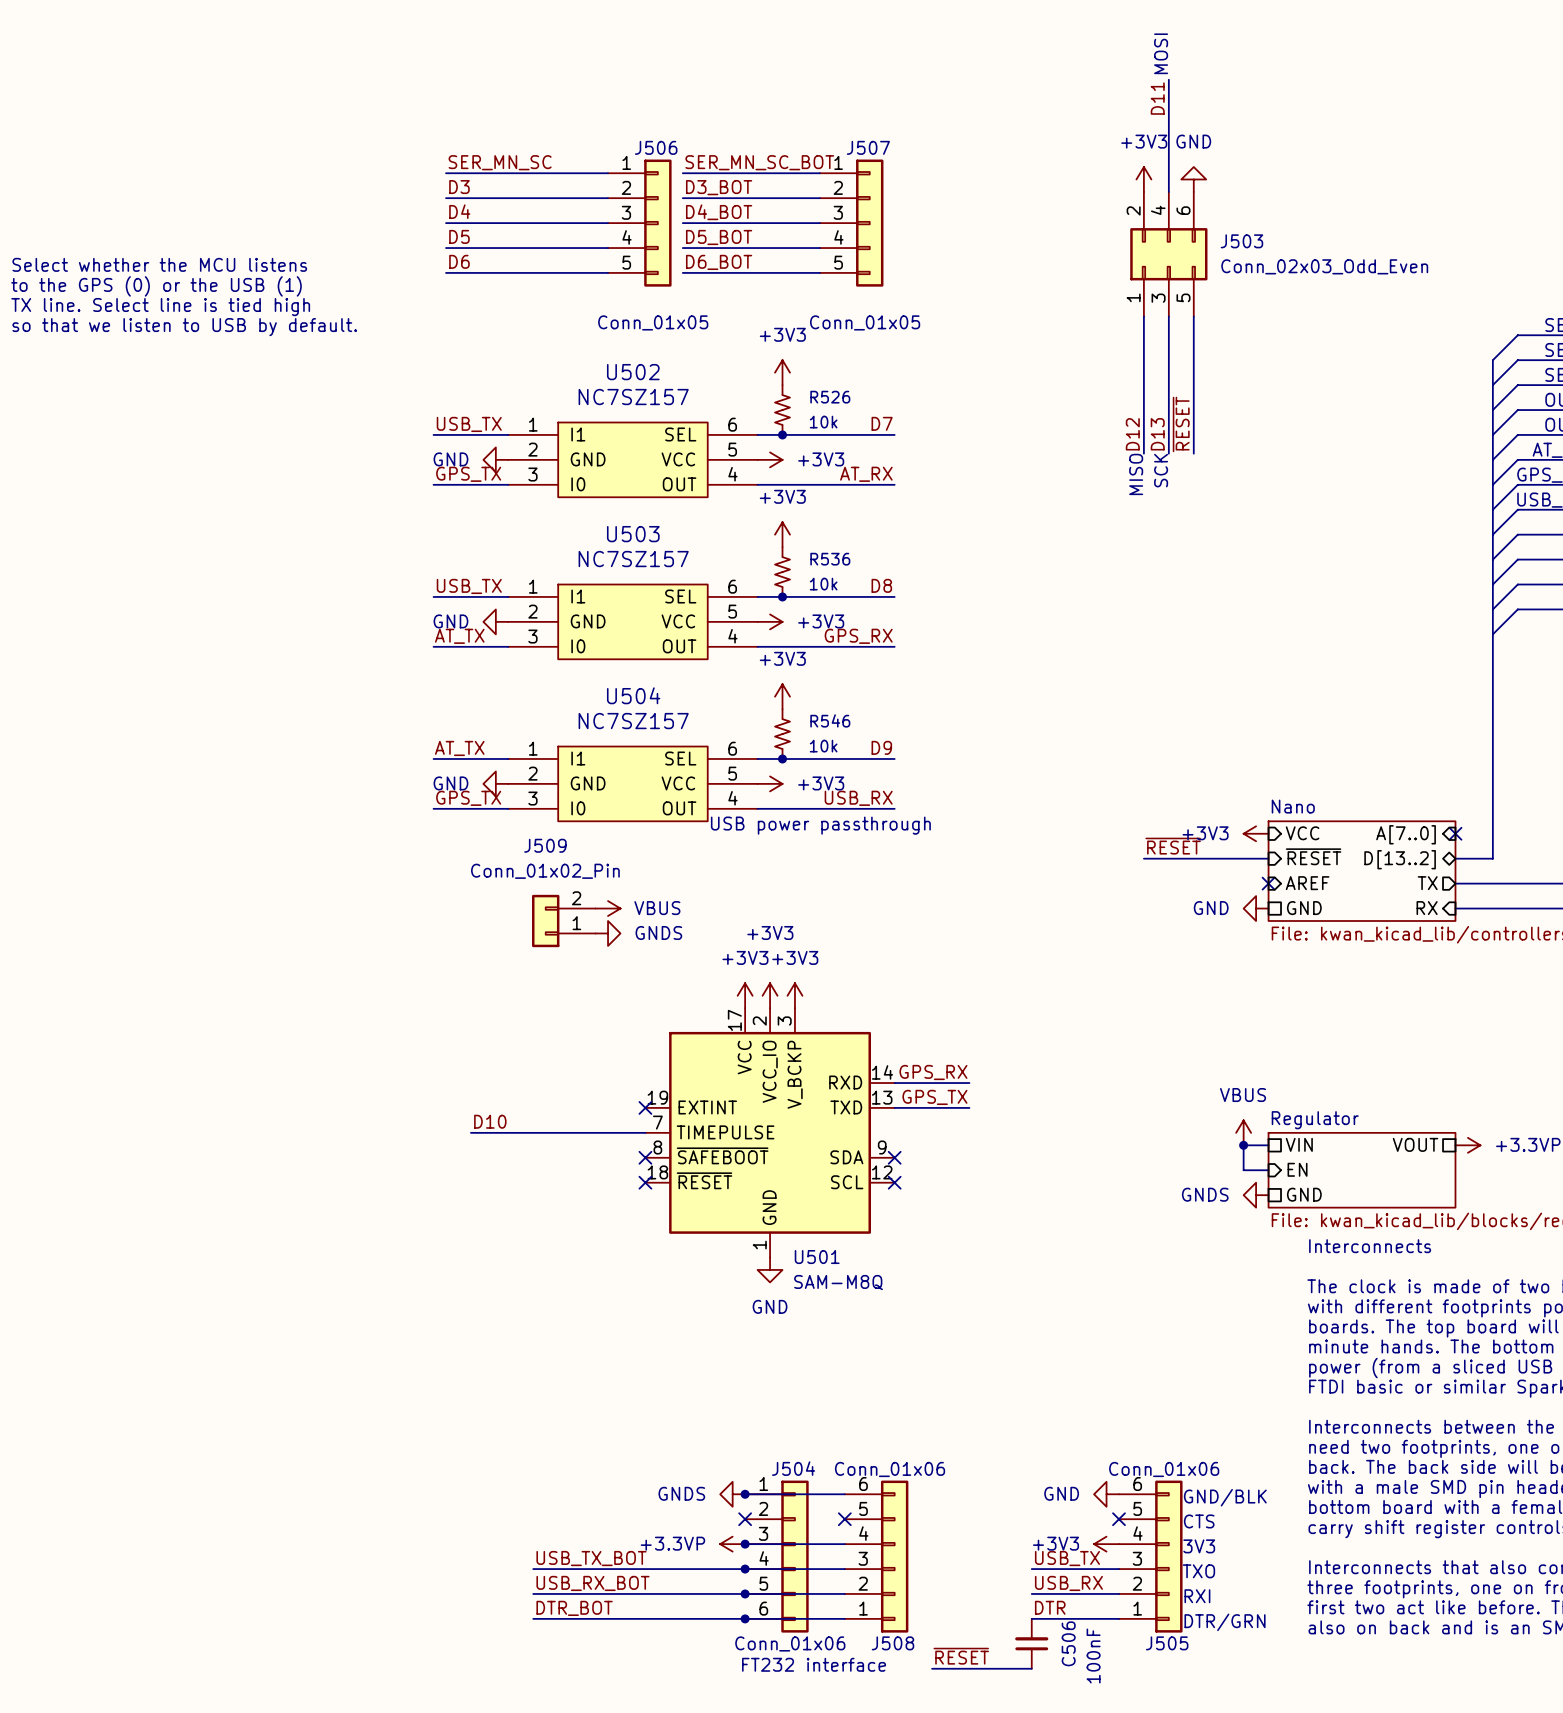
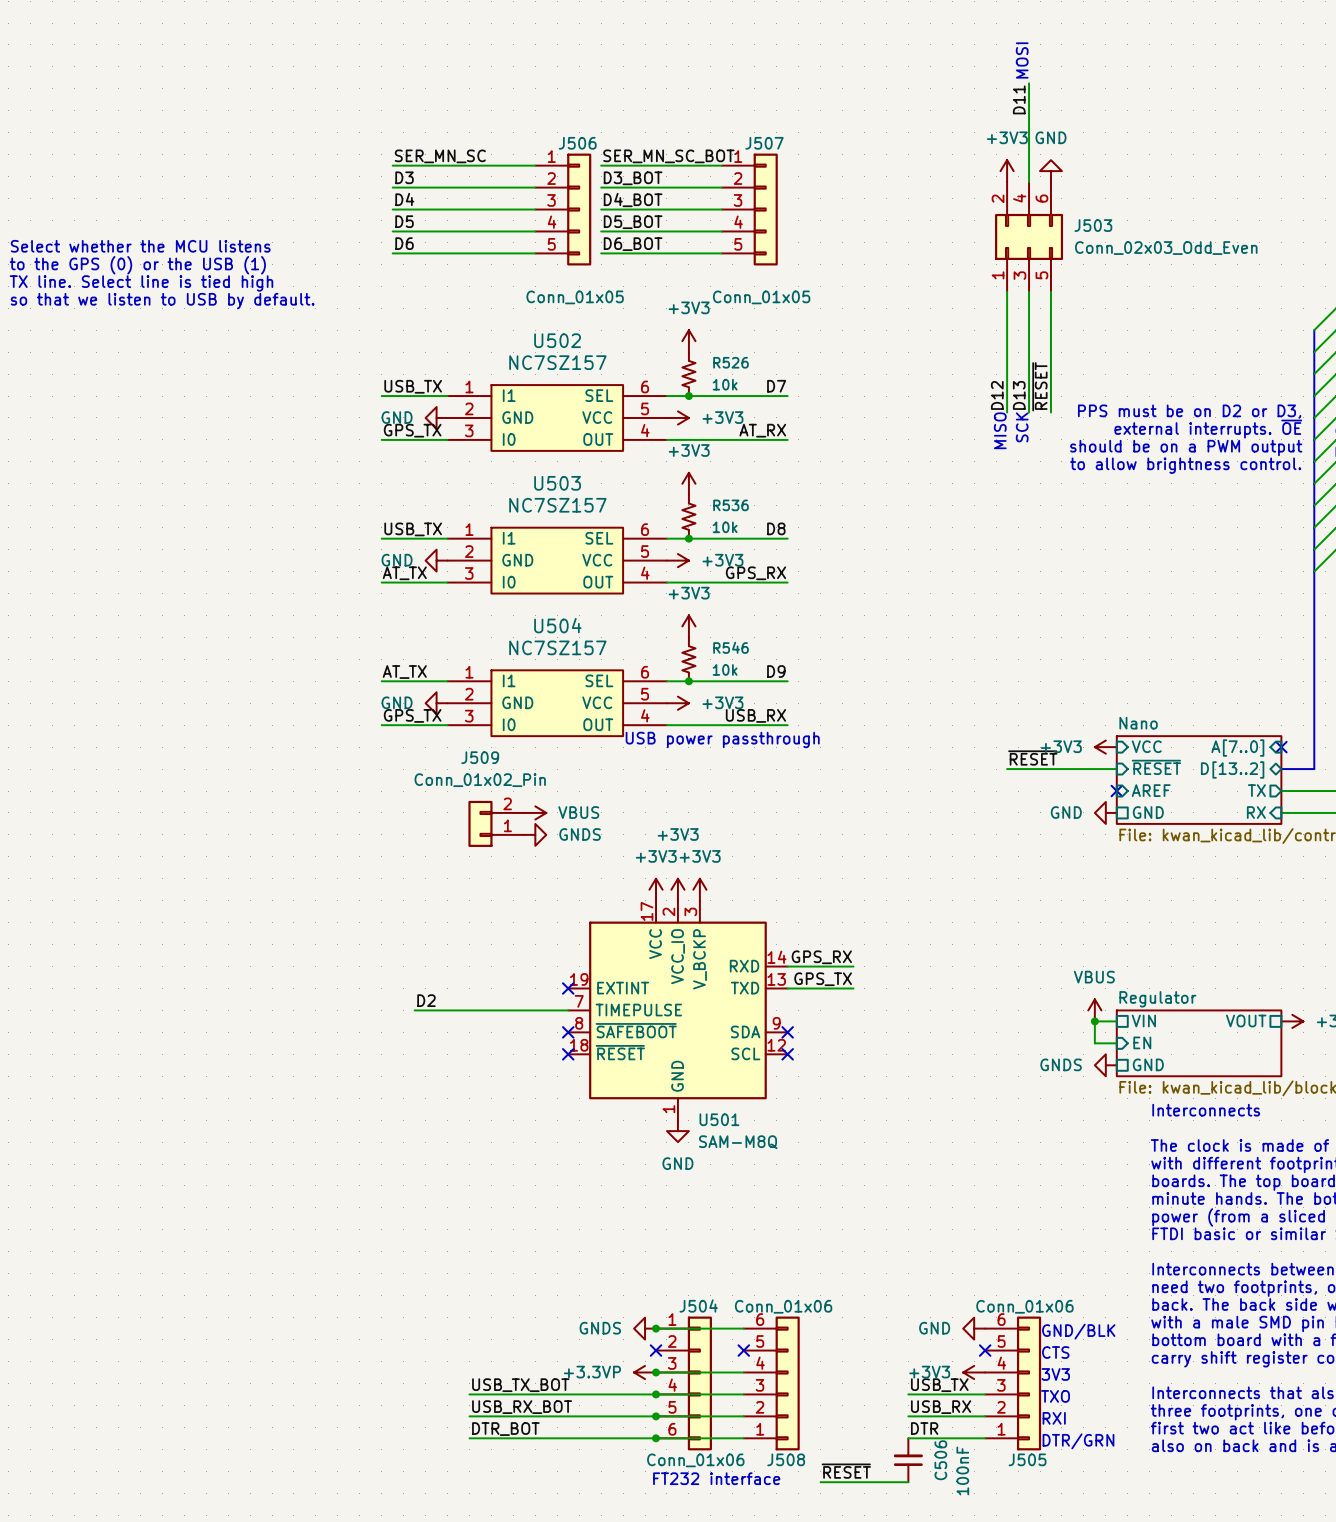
text: none -> PPS must be on D2 or D3, (1189, 411)
text: none -> external interrupts. ~{OE} (1208, 429)
text: none -> should be on a PWM output (1186, 448)
text: none -> to allow brightness control. (1185, 465)
label: D10 (490, 1121) -> D2 (426, 1000)

